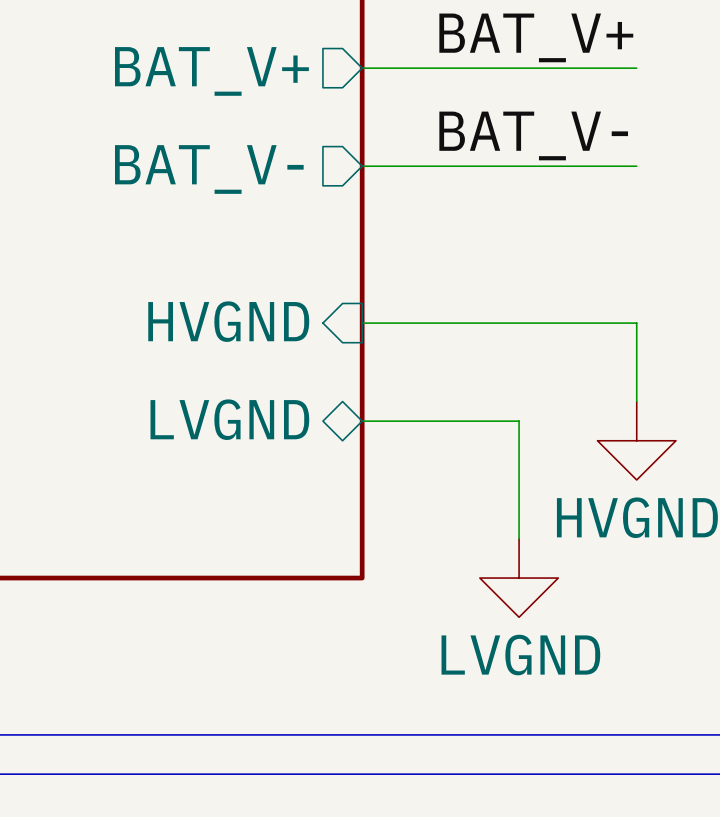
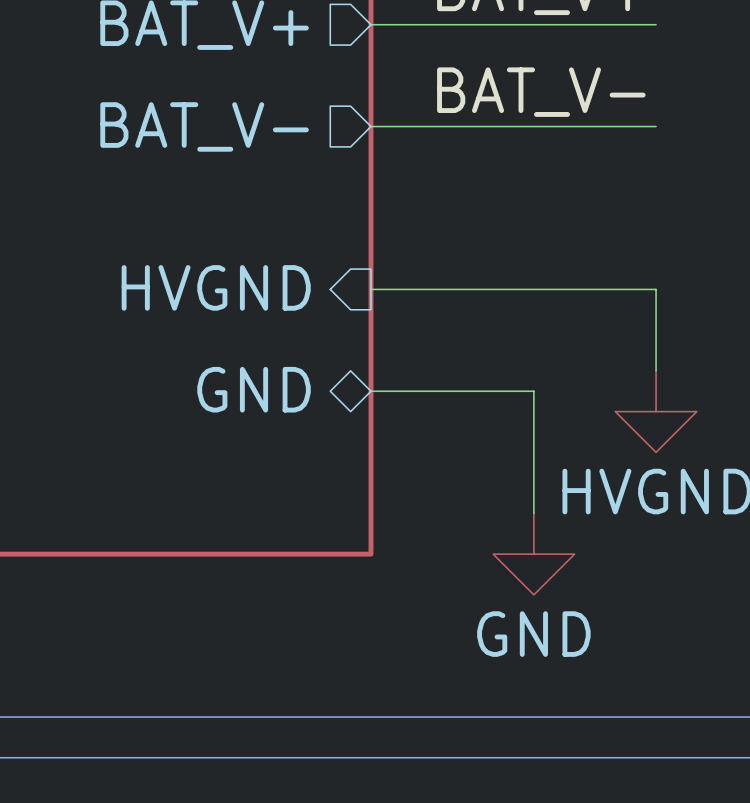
sheet pin: LVGND (229, 419) -> GND (254, 389)
power symbol: LVGND (519, 578) -> GND (533, 554)

